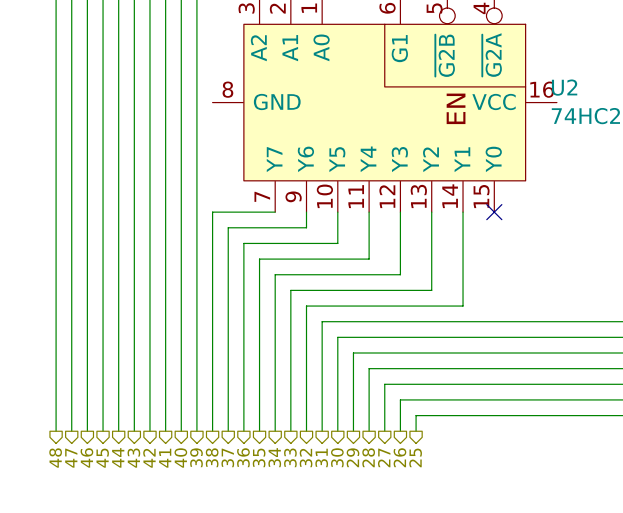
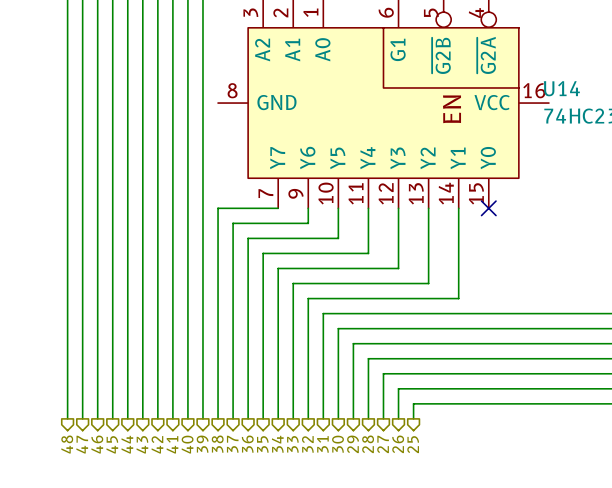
U2 name: U2 (564, 87) -> U14 (561, 88)

